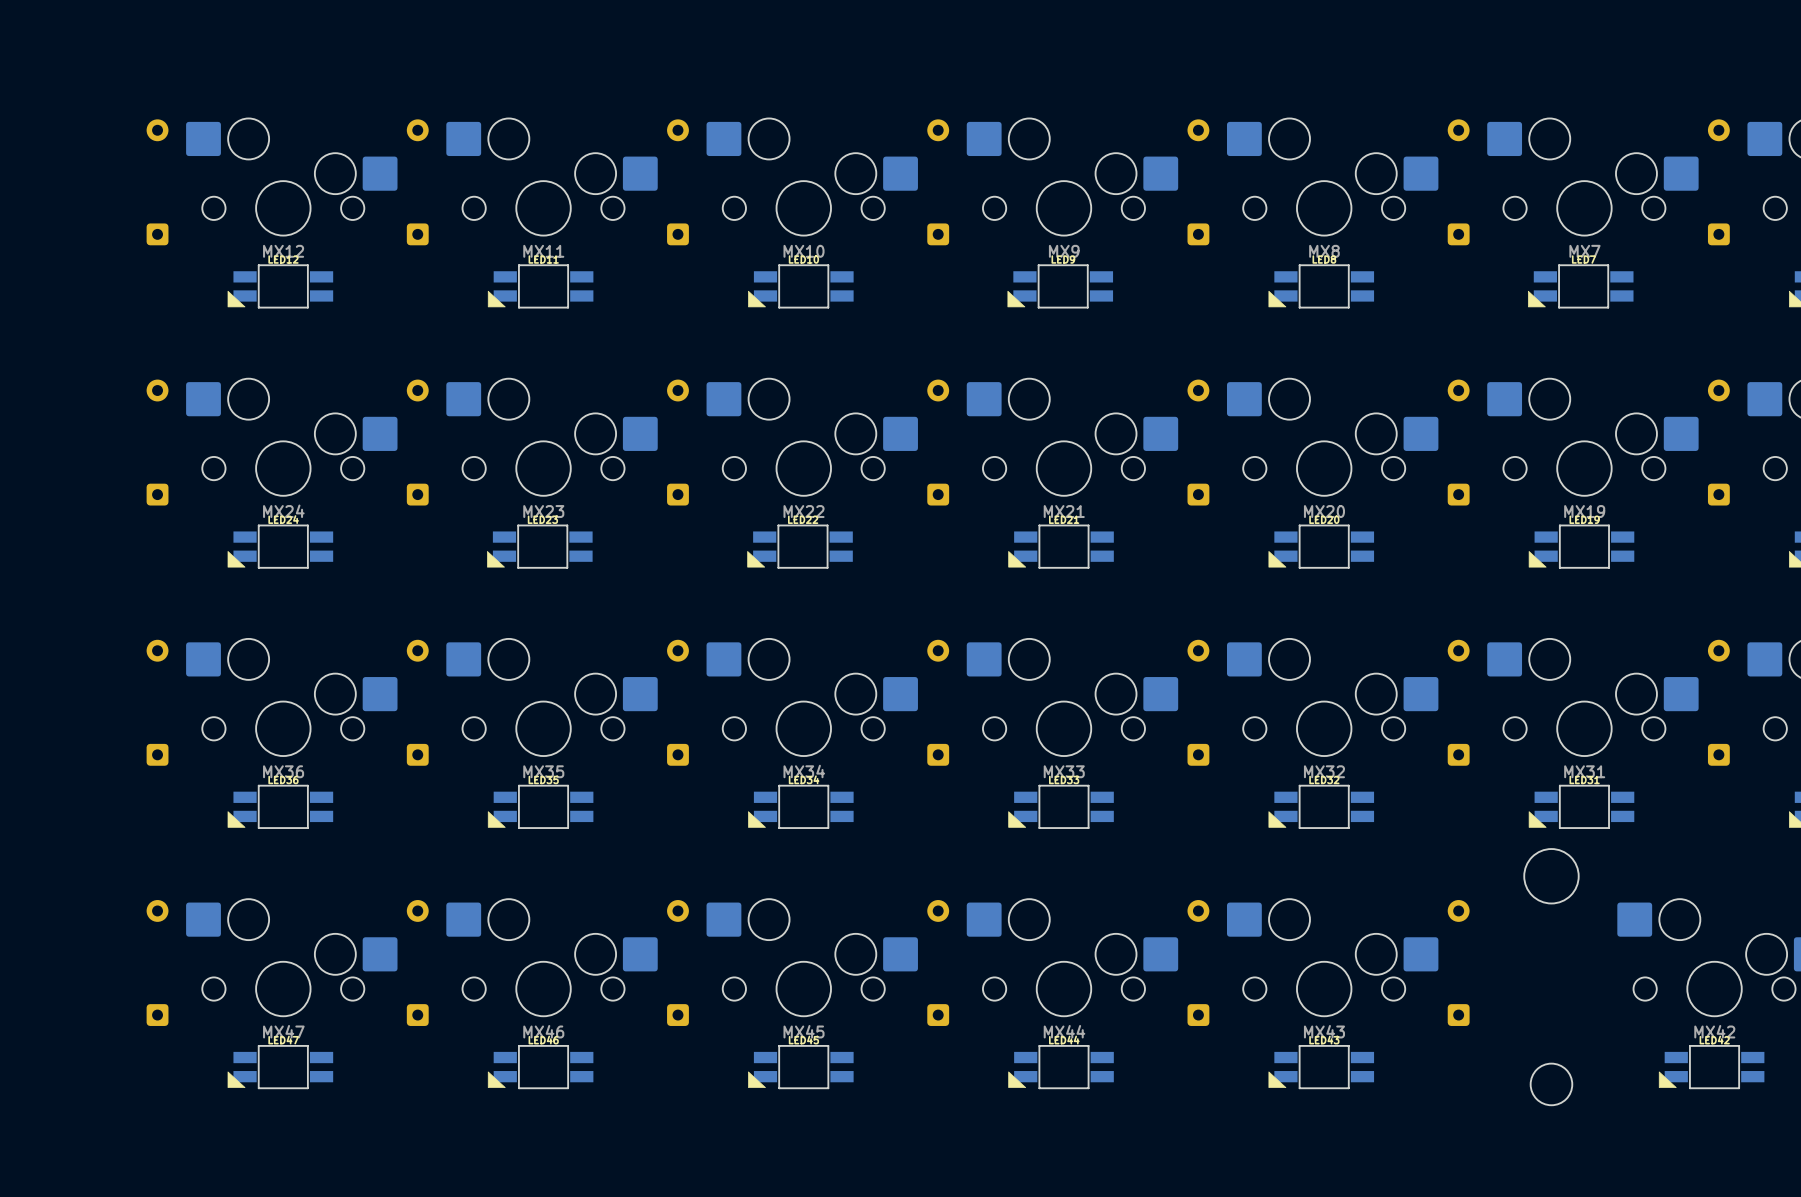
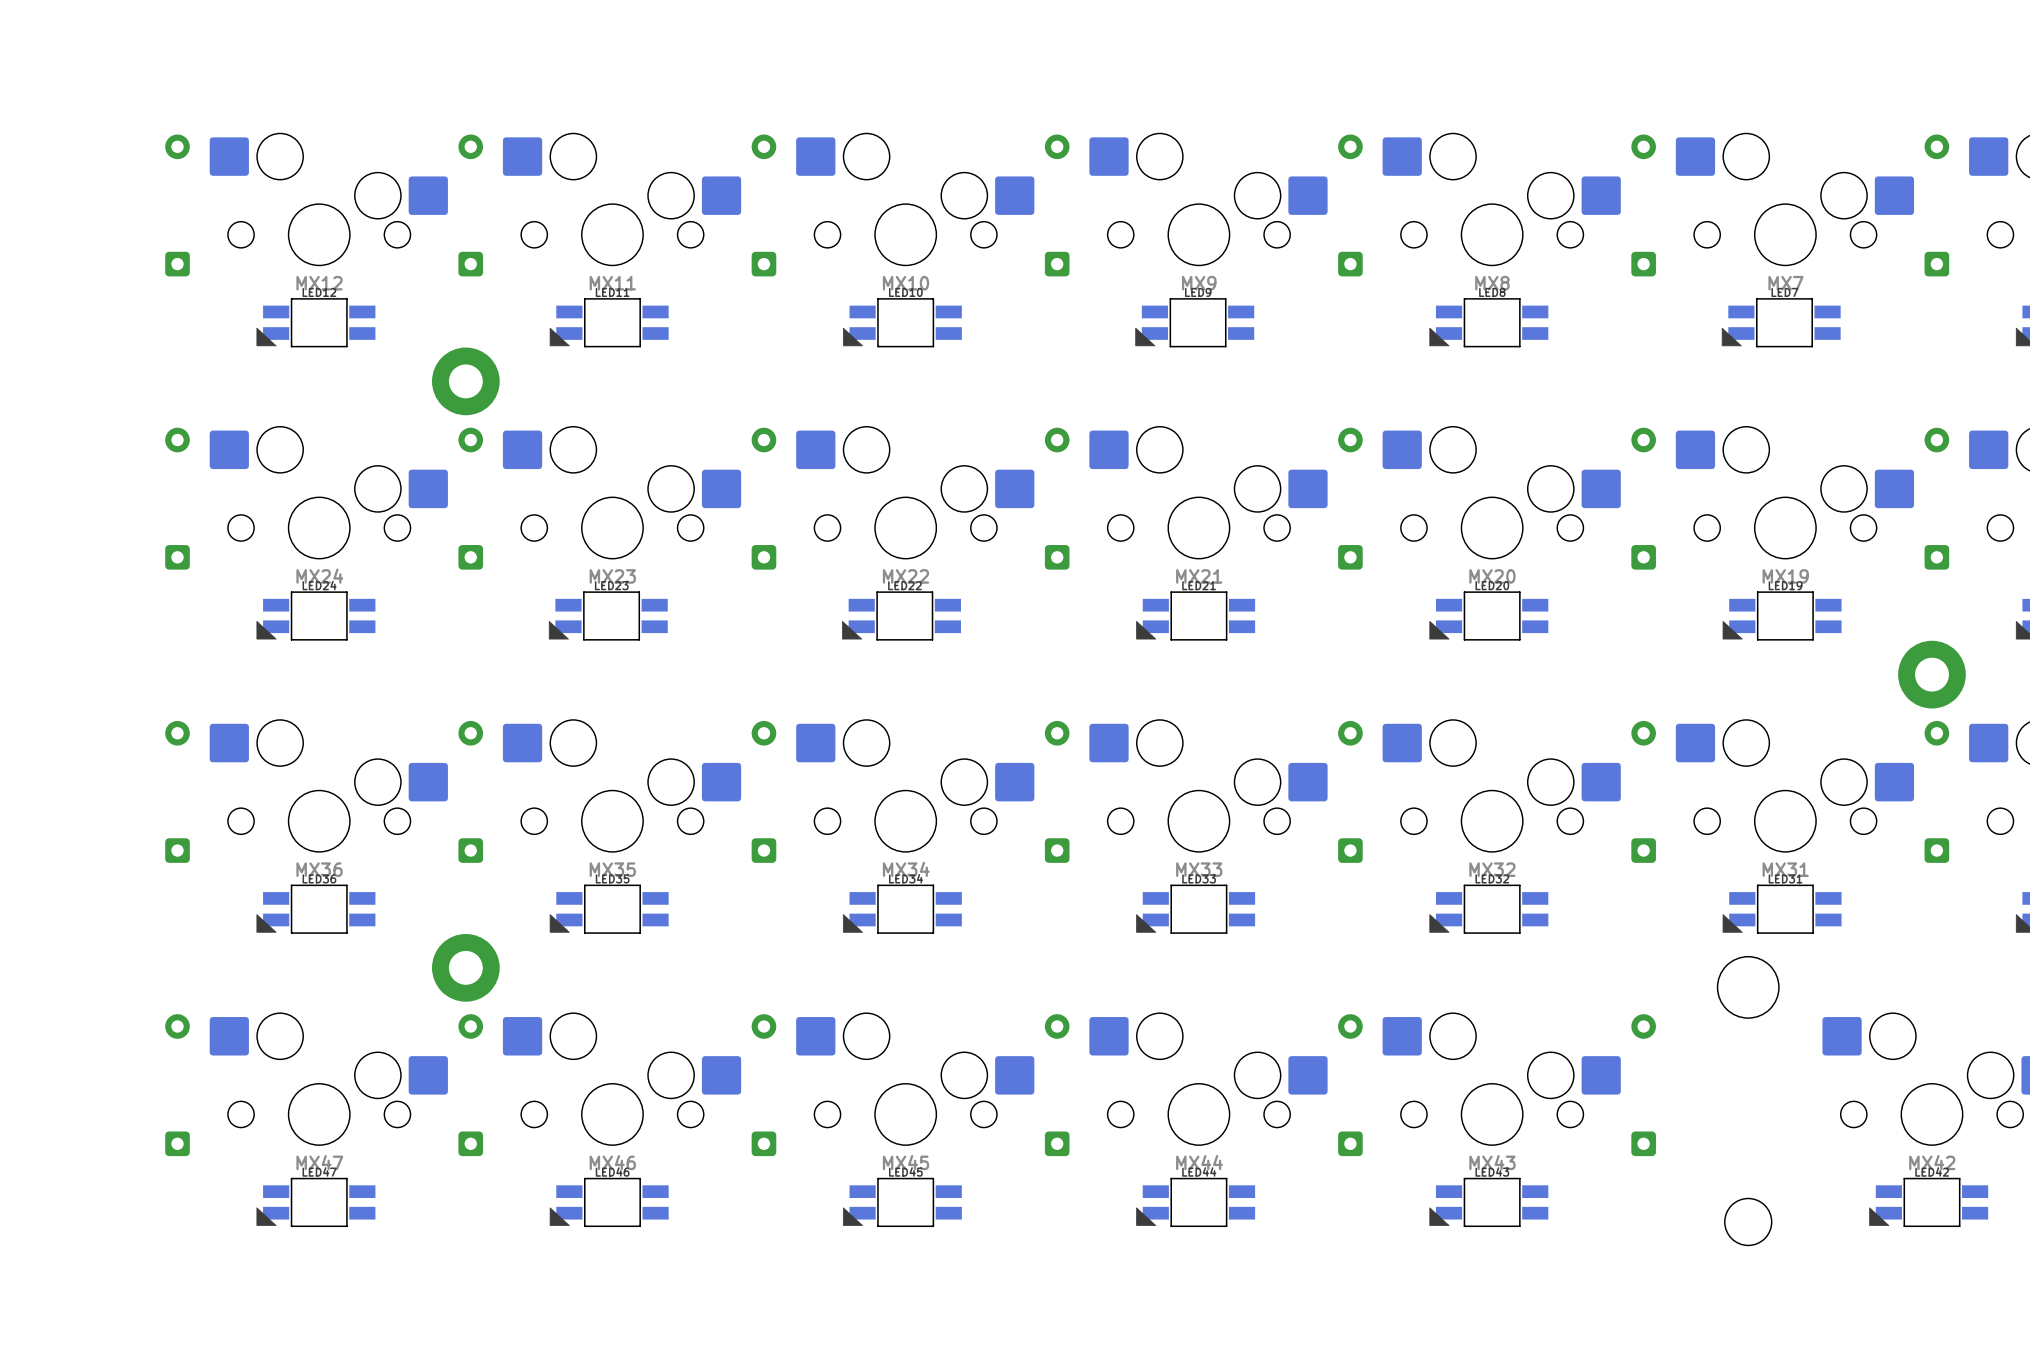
part: none -> (465, 381)
part: none -> (1931, 674)
part: none -> (465, 967)

